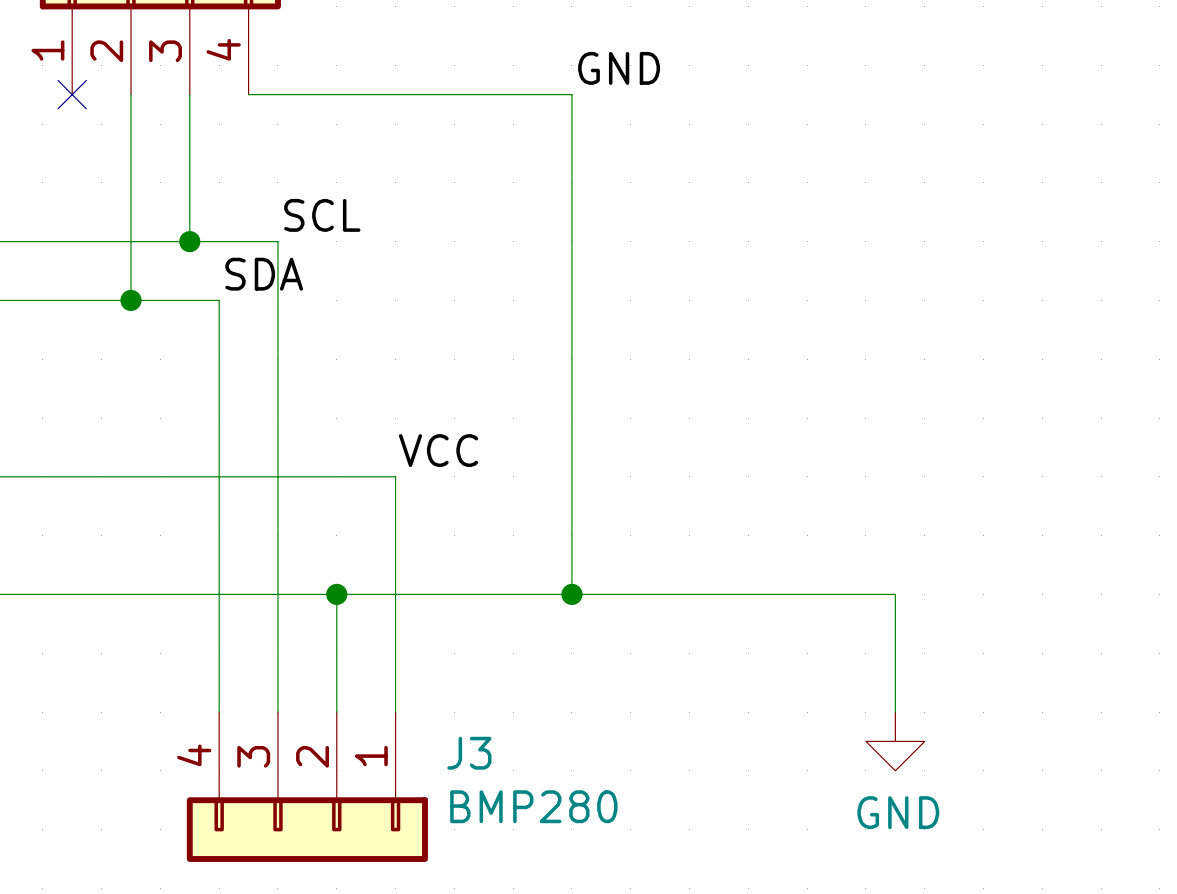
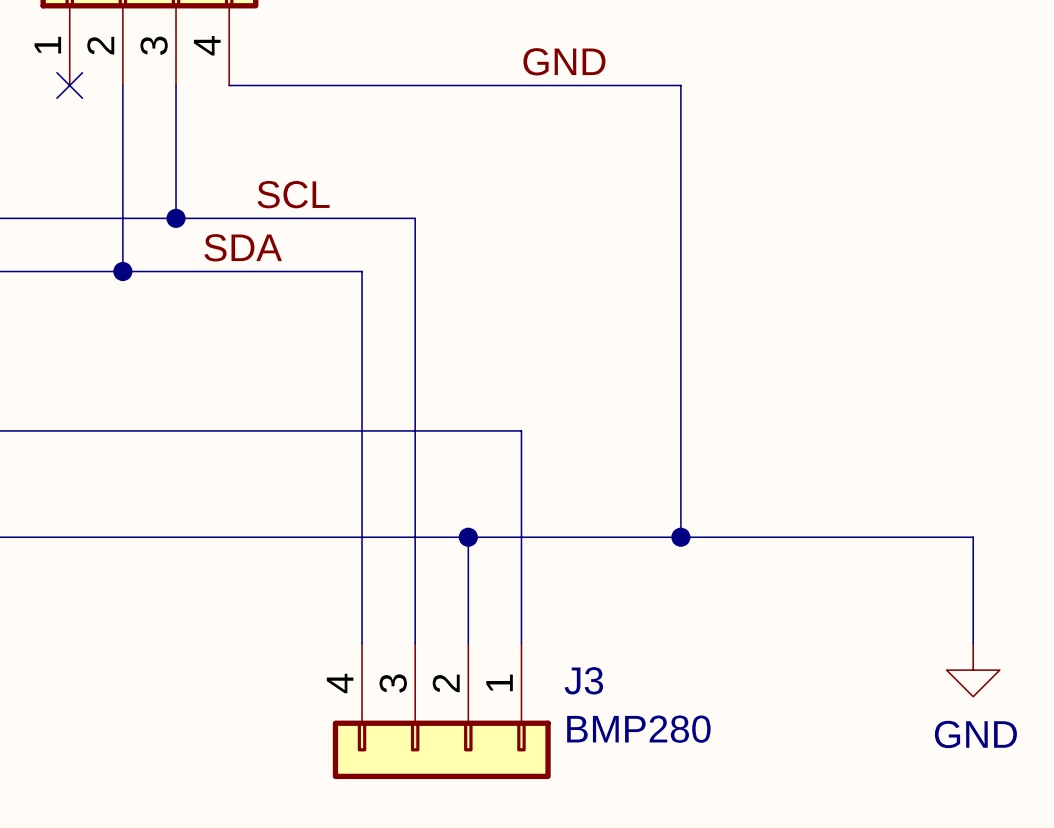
wire: (571, 94) (571, 476) -> (521, 85) (680, 85) (680, 537)
wire: (277, 241) (277, 712) -> (255, 218) (415, 218) (415, 643)
wire: (219, 300) (219, 712) -> (202, 271) (362, 271) (362, 430) (521, 430)
label: VCC (438, 450) -> none
wire: (336, 594) (336, 712) -> (468, 537) (468, 643)
junction: (336, 594) -> none
wire: none -> (521, 537) (521, 643)
junction position: (571, 594) -> (468, 537)
junction: none -> (680, 537)
wire: (895, 594) (895, 712) -> (813, 537) (973, 537) (973, 643)
power symbol position: GND (895, 741) -> GND (973, 670)
J3 position: (307, 786) -> (441, 711)

